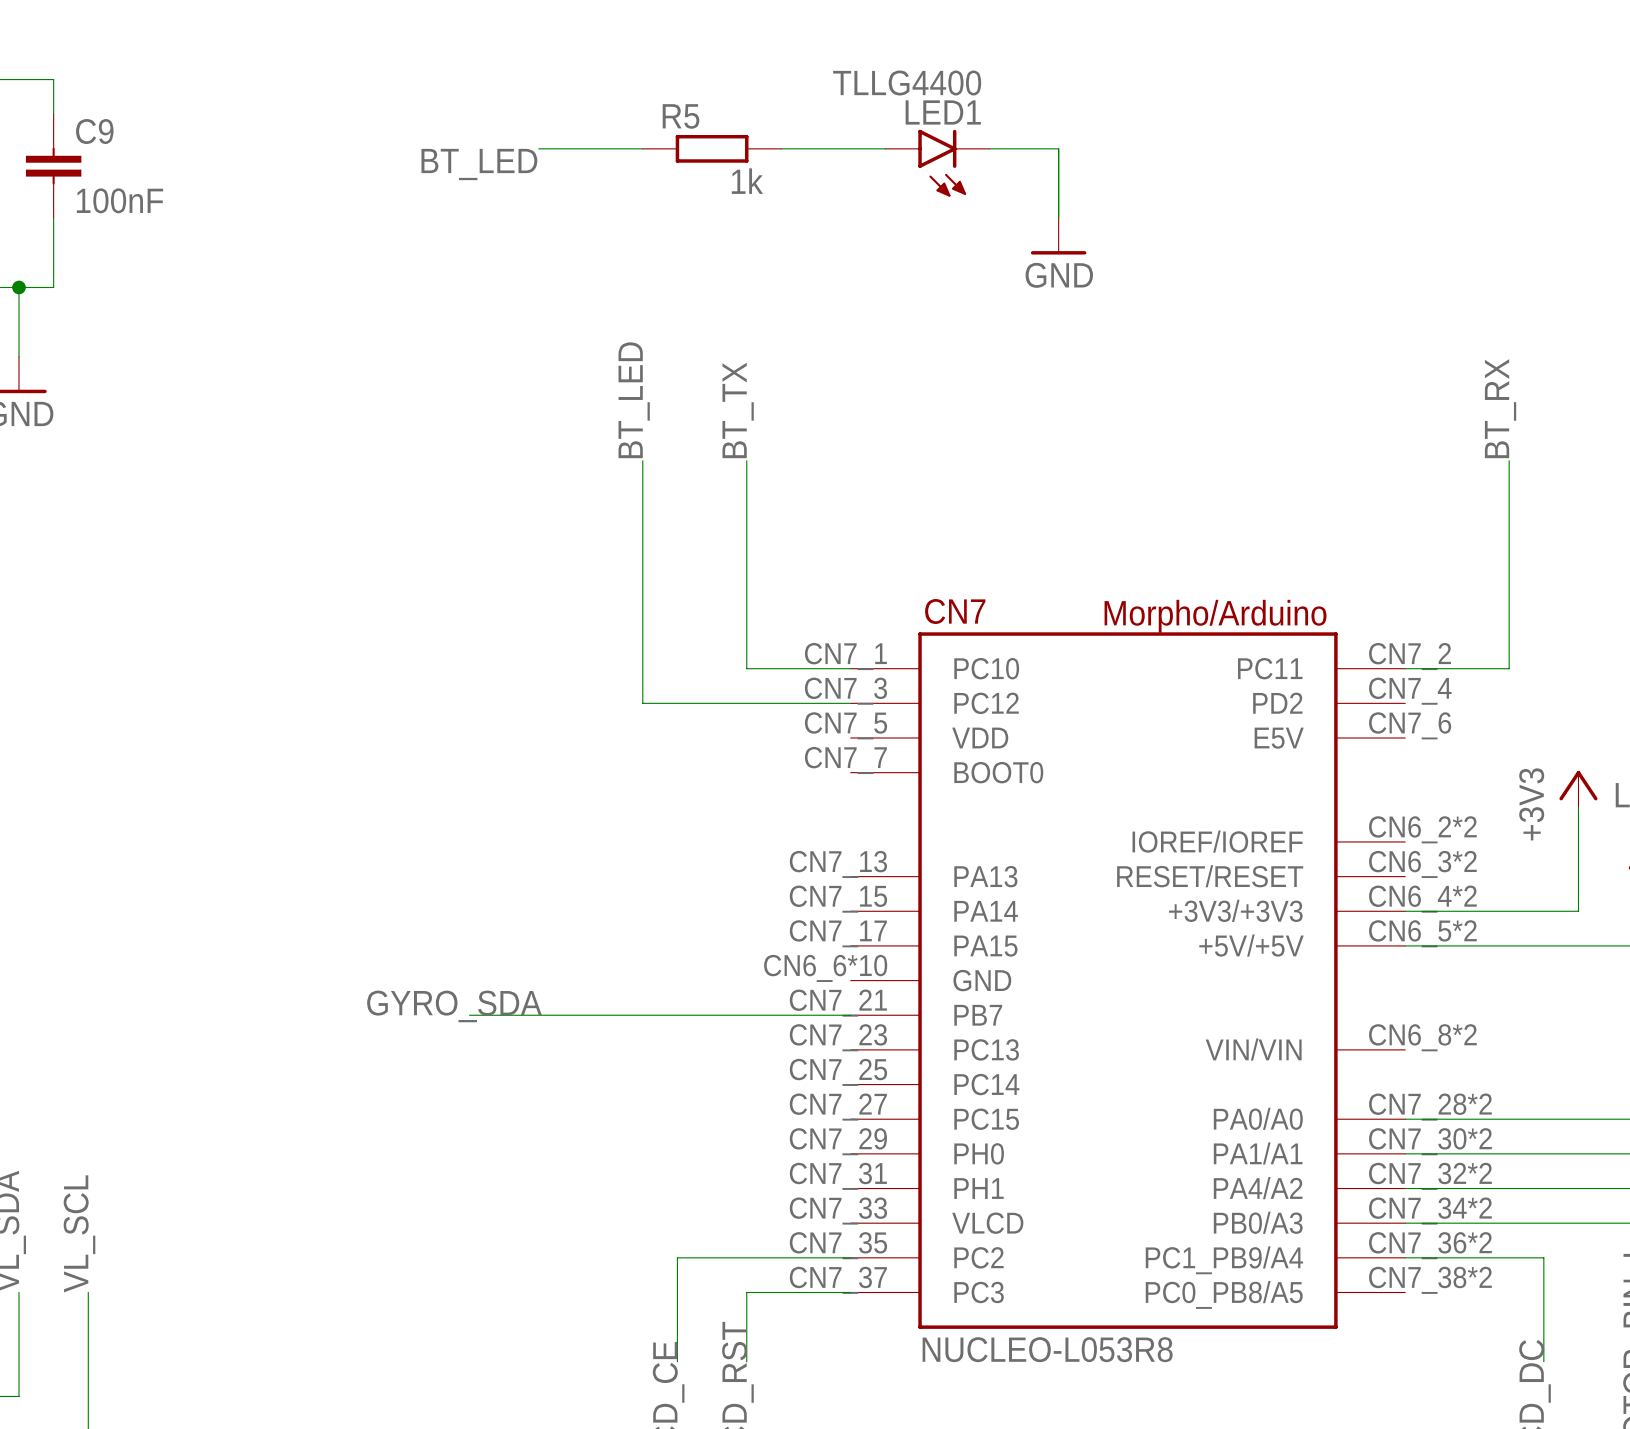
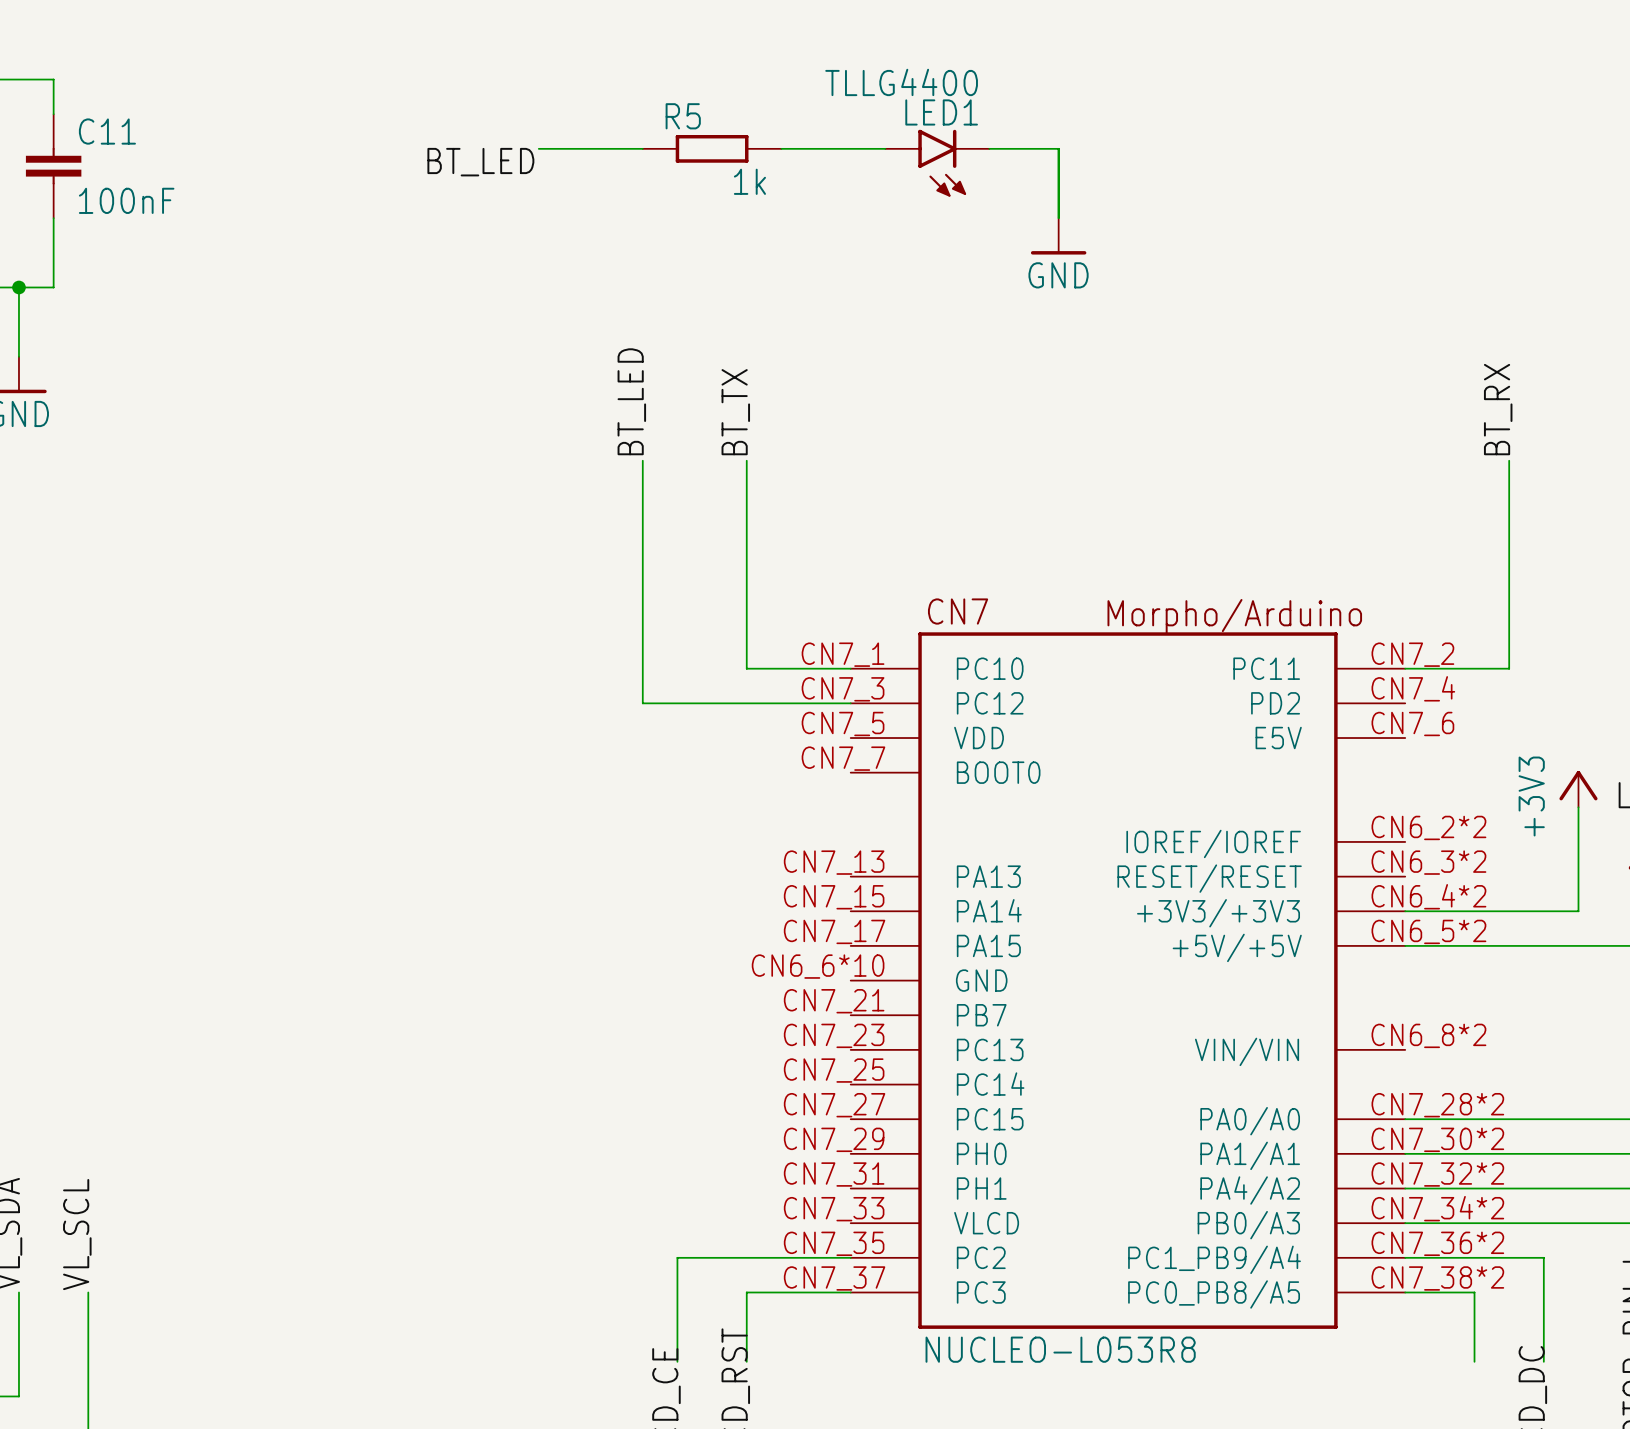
C9 name: C9 (94, 131) -> C11 (107, 131)
label: GYRO_SDA (454, 1006) -> none
wire: (469, 1015) (850, 1015) -> none
wire: none -> (1405, 1292) (1474, 1292) (1474, 1361)

